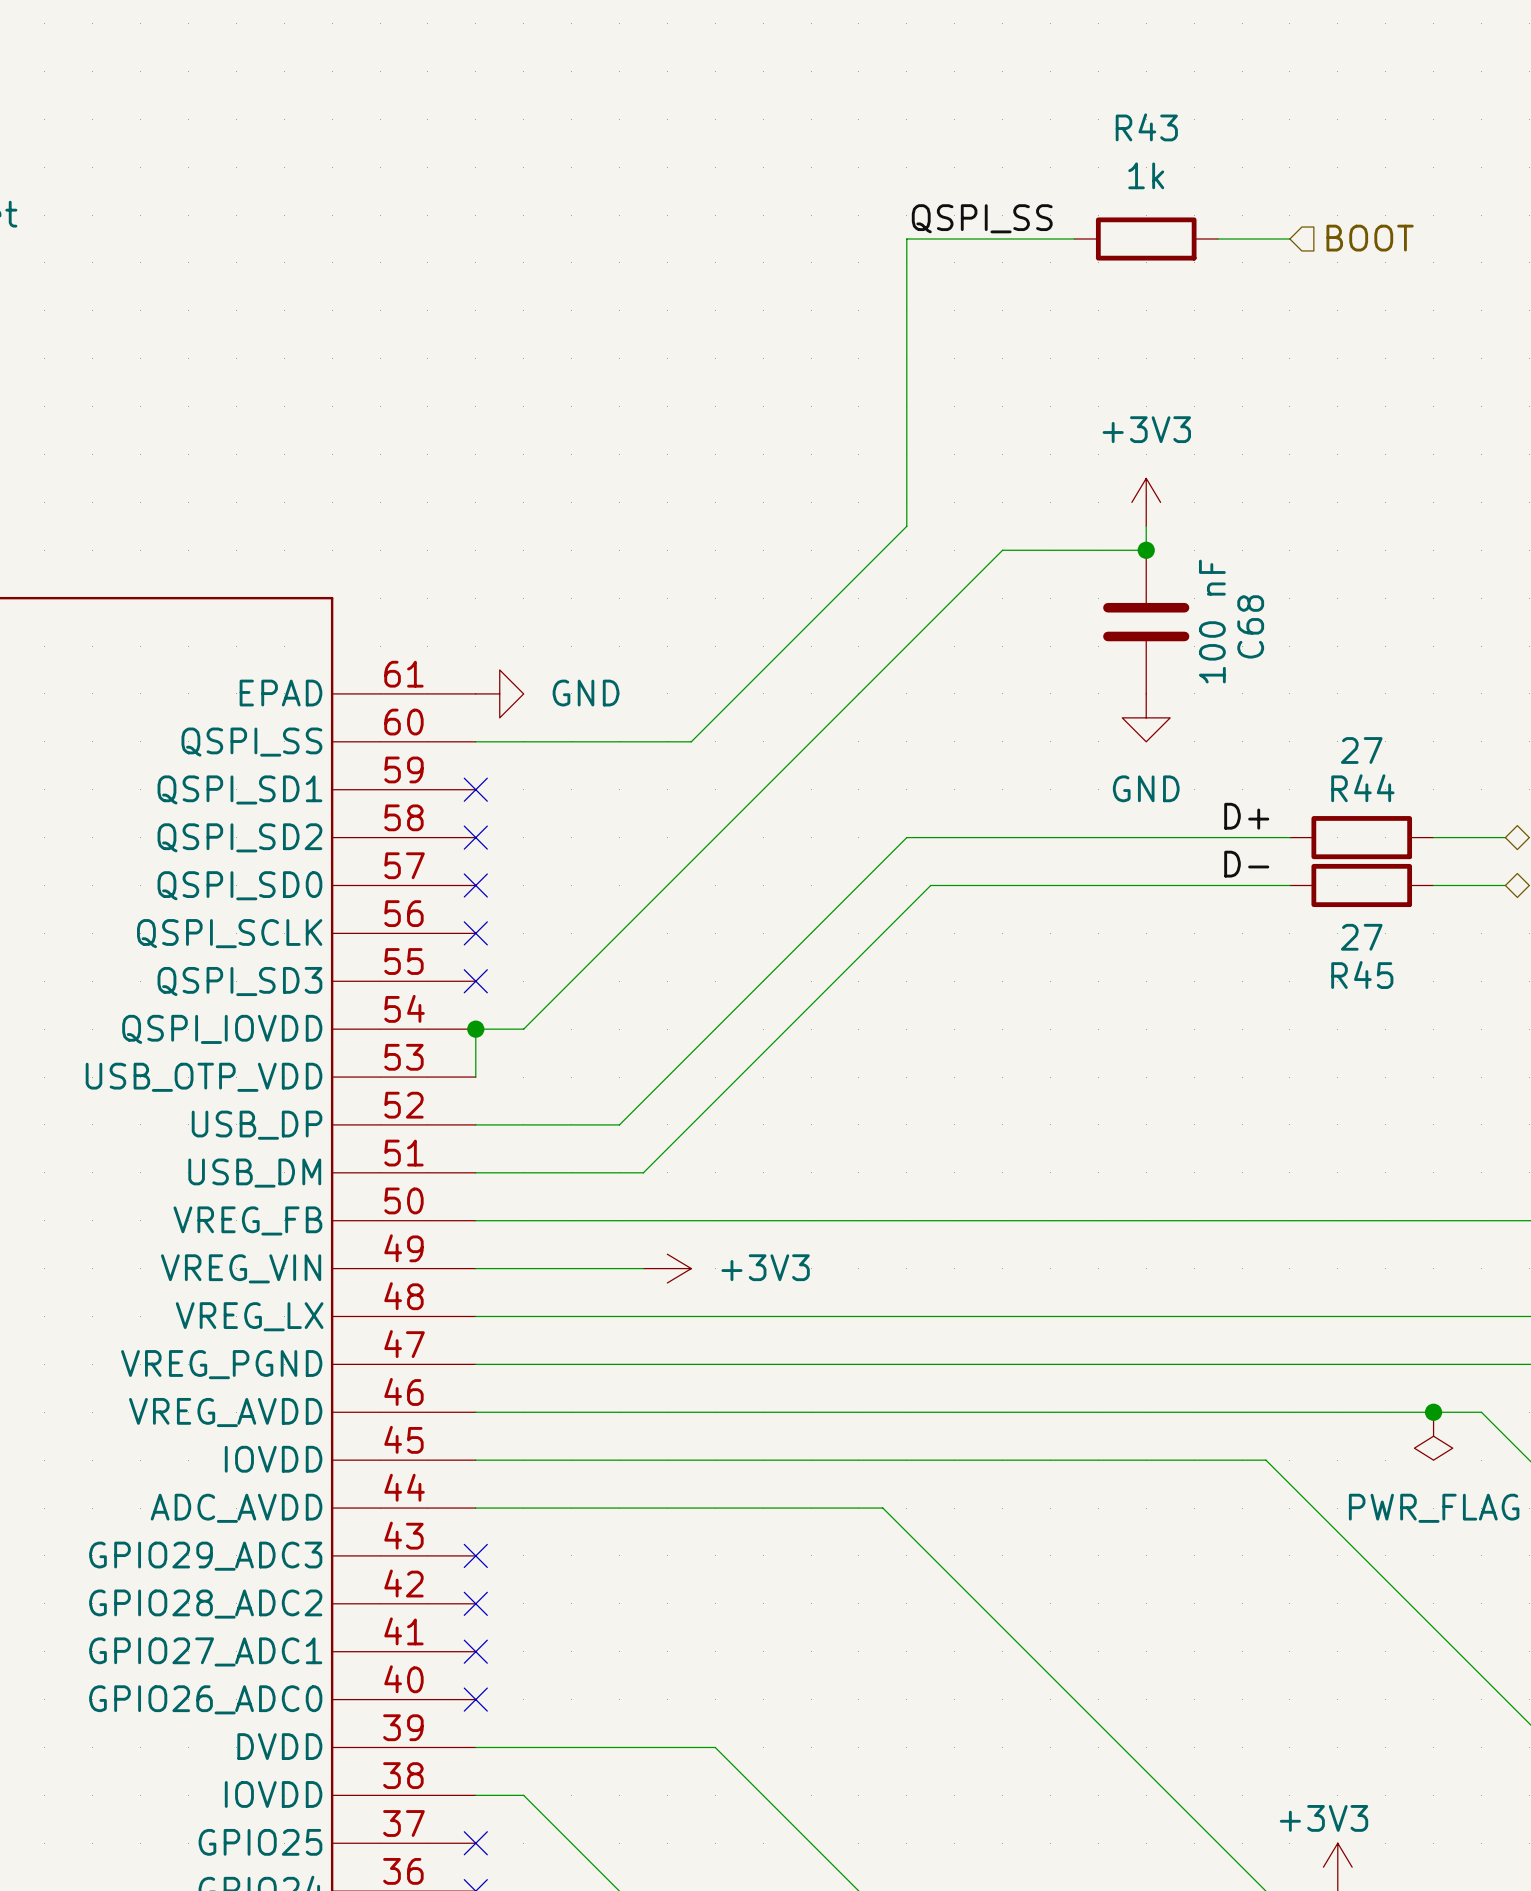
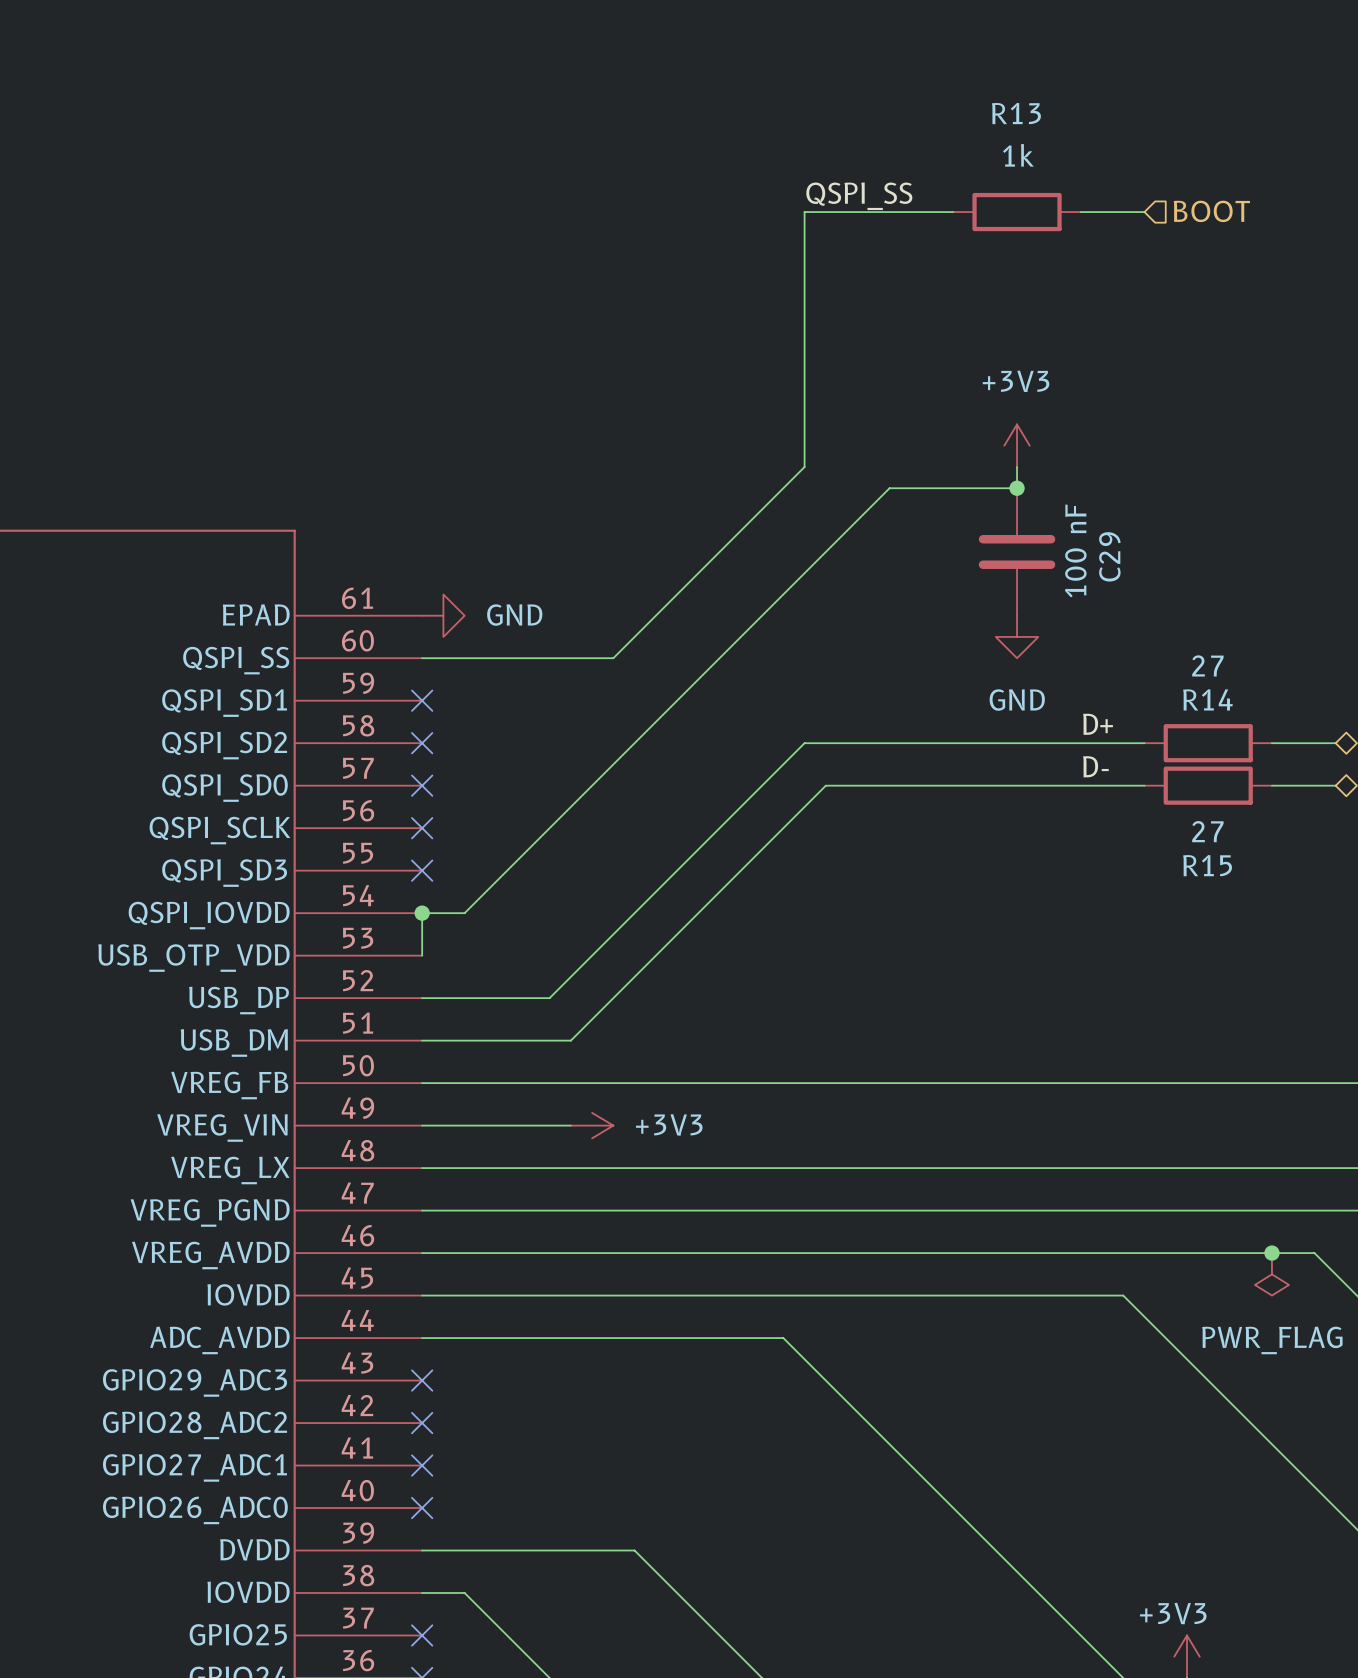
R43 name: R43 (1146, 127) -> R13 (1016, 113)
C68 name: C68 (1250, 626) -> C29 (1109, 556)
R44 name: R44 (1362, 788) -> R14 (1207, 699)
R45 name: R45 (1362, 975) -> R15 (1207, 865)

